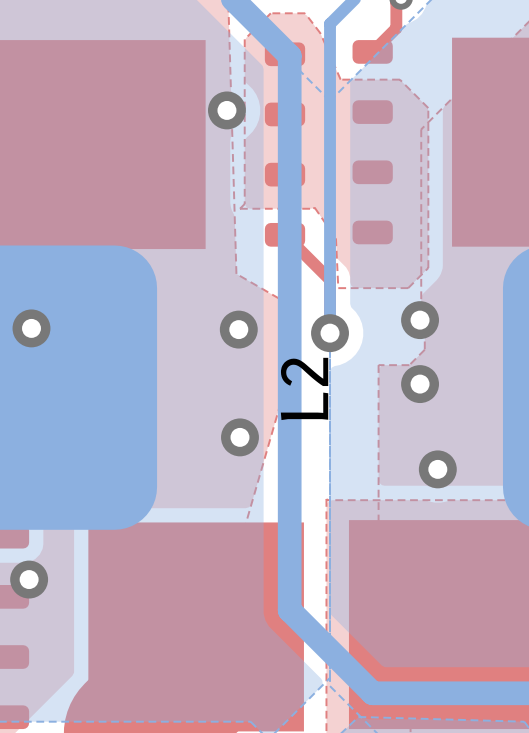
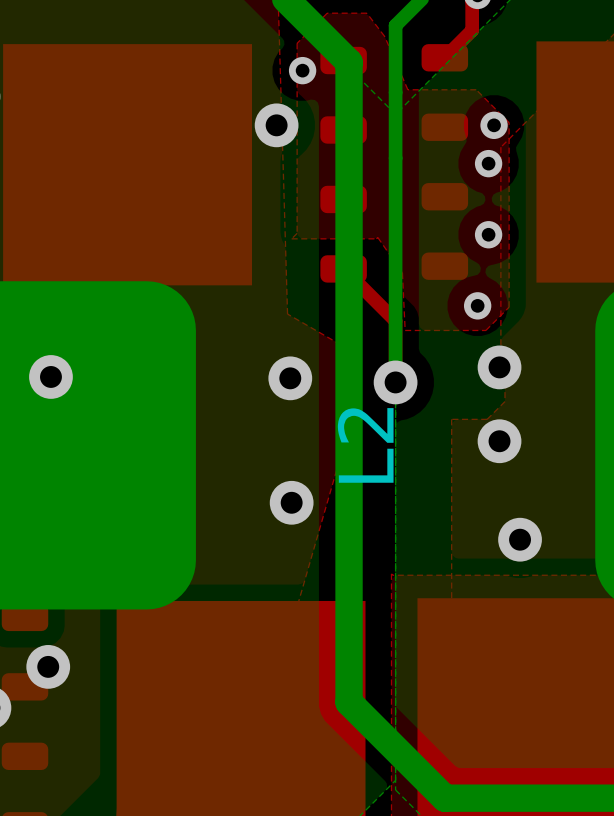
via: none -> (302, 70)
via: none -> (494, 125)
via: none -> (488, 163)
via: none -> (488, 234)
via: none -> (477, 305)

